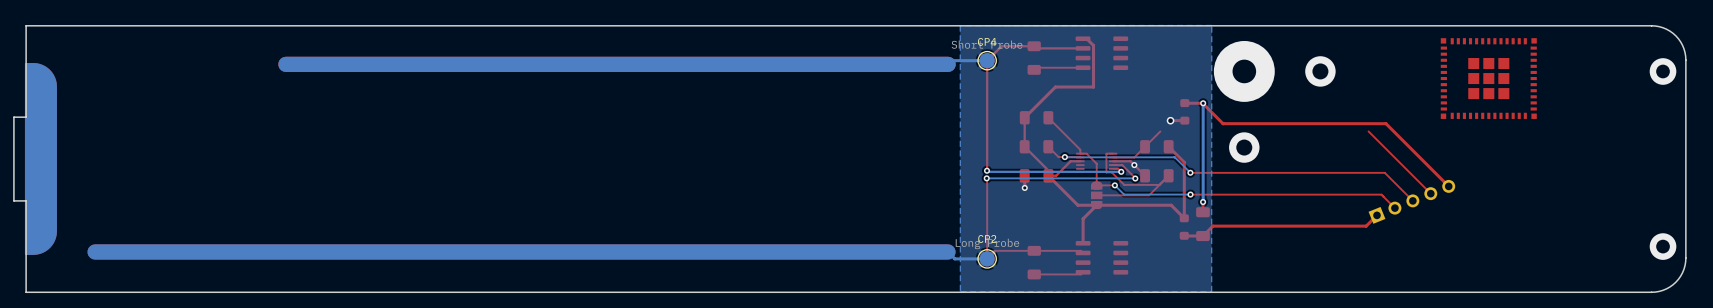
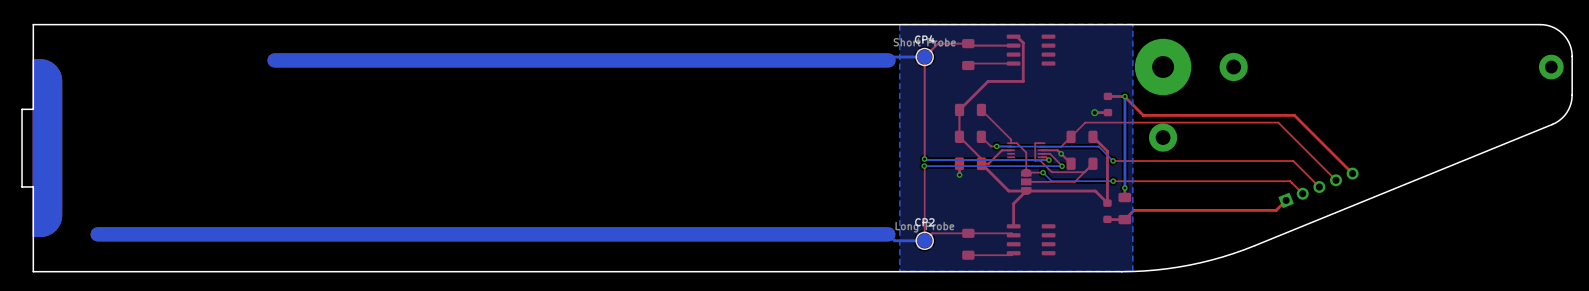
board edge: (1651, 25) (26, 25) (26, 117) (13, 117) (13, 200) (26, 200) (26, 292) (1655, 292) (1666, 288) (1675, 282) (1682, 272) (1685, 261) (1685, 60) (1682, 45) (1675, 35) (1662, 27) (1651, 25) -> (1540, 24) (1550, 26) (1560, 31) (1567, 39) (1571, 49) (1571, 98) (1568, 109) (1558, 120) (1244, 249) (1211, 260) (1178, 267) (1121, 271) (33, 271) (33, 186) (22, 186) (22, 109) (33, 109) (33, 24) (1540, 24)
part: (1488, 78) -> none
top track: none -> (1278, 122) (1085, 122)
via: (1663, 246) -> none

